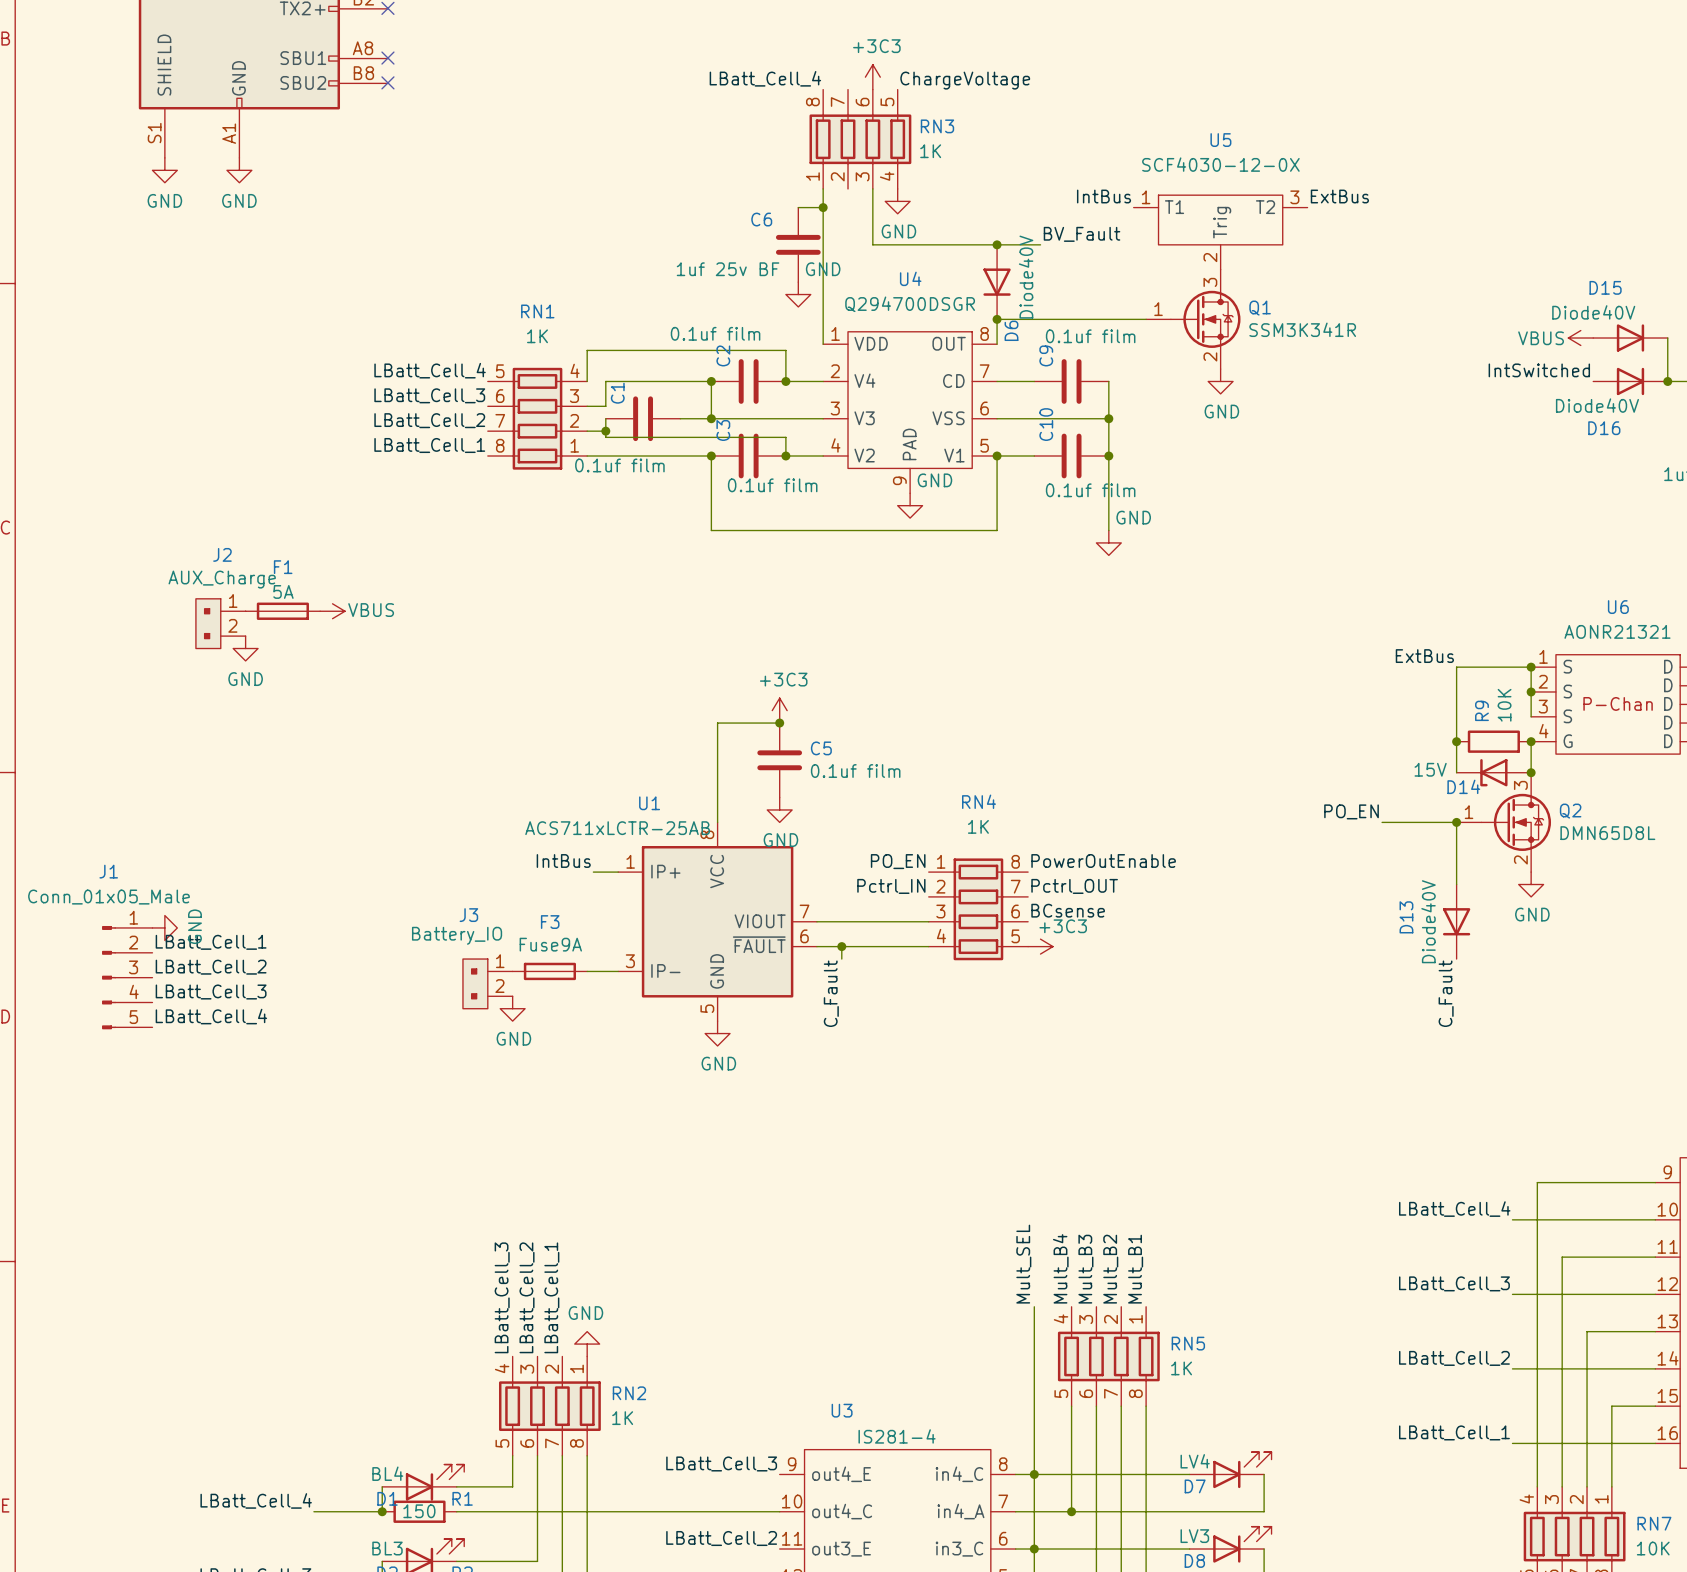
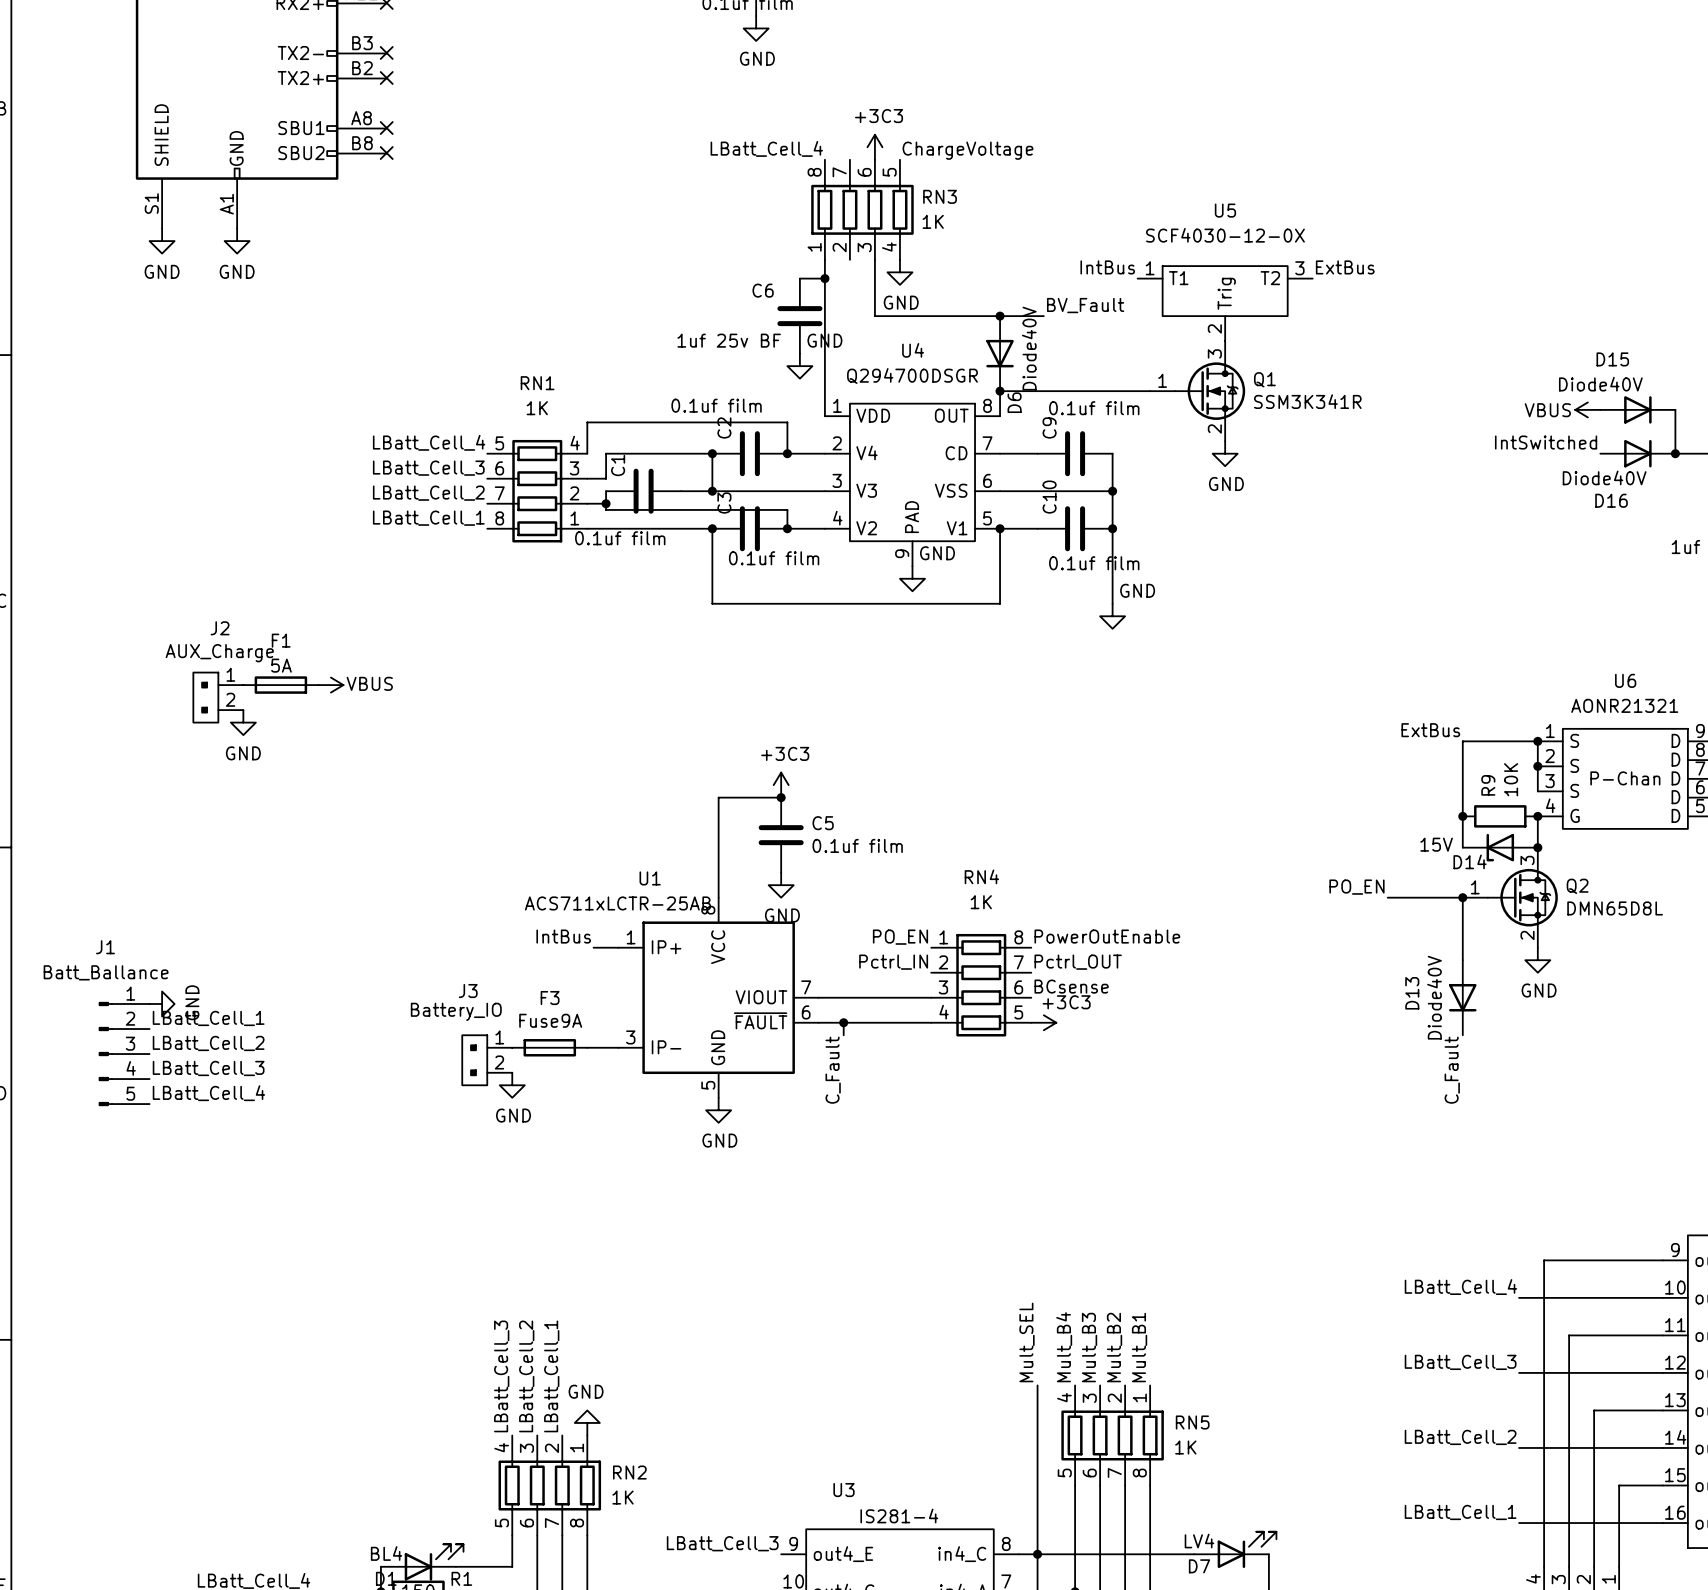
J1 value: Conn_01x05_Male (108, 897) -> Batt_Ballance (106, 972)

